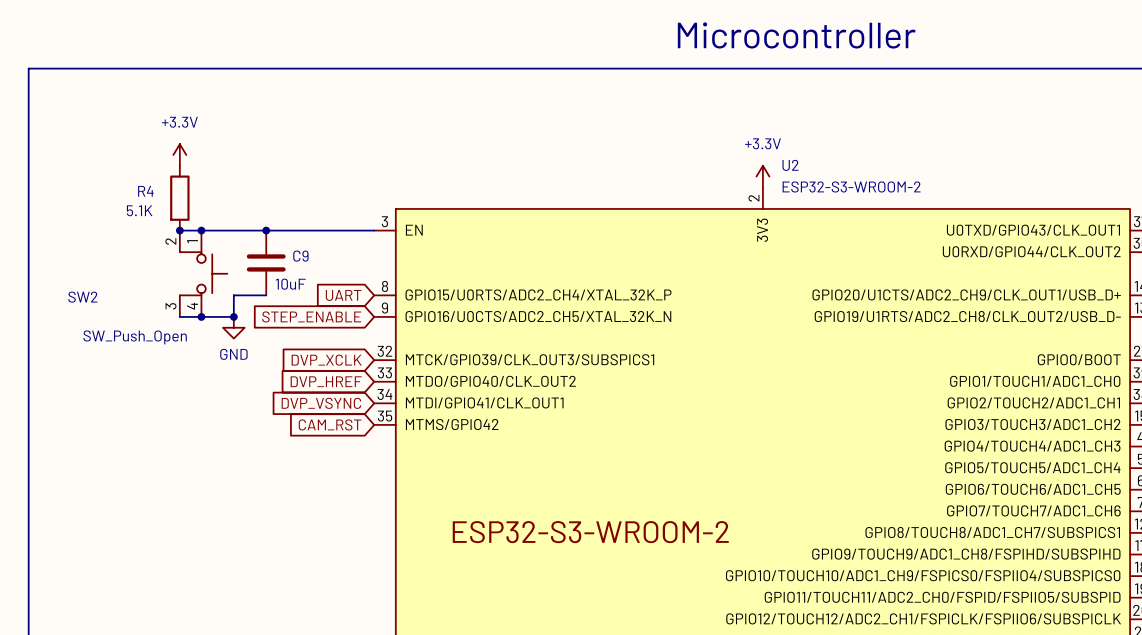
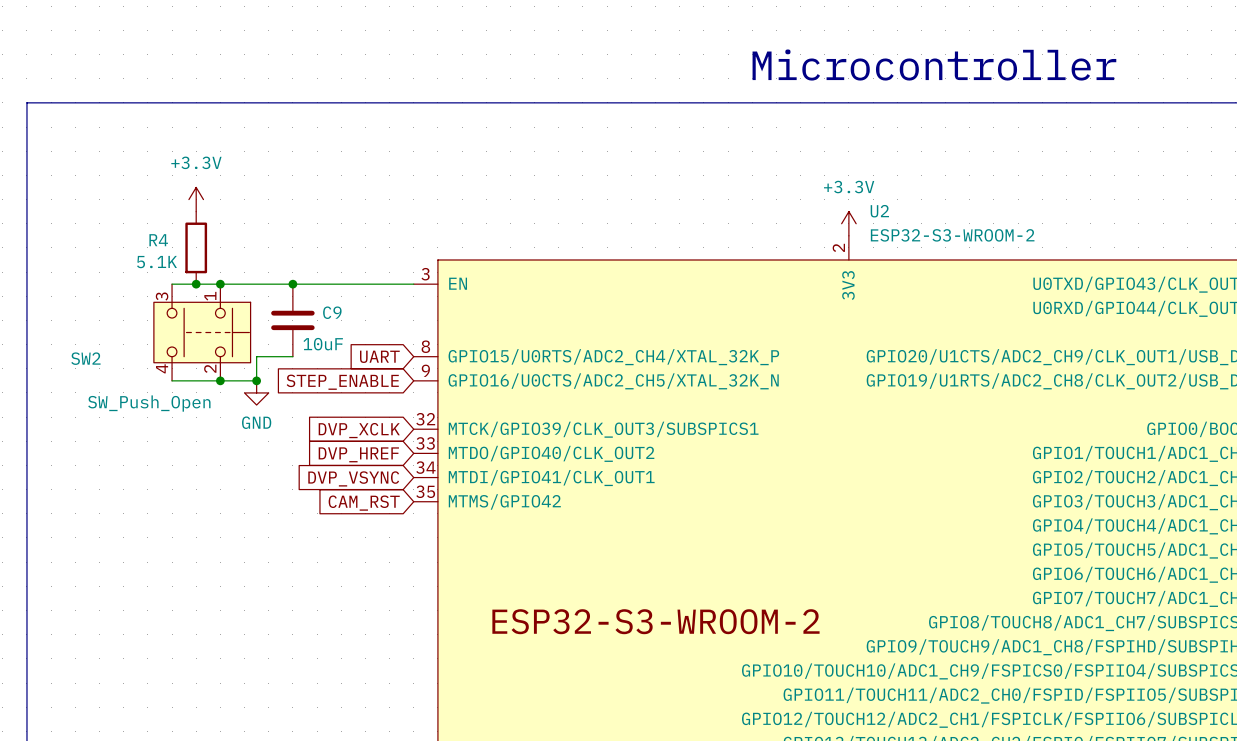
wire: none -> (172, 284) (196, 284)
SW2 symbol: [179, 230, 228, 317] -> [153, 284, 251, 381]
wire: none -> (172, 380) (196, 380)

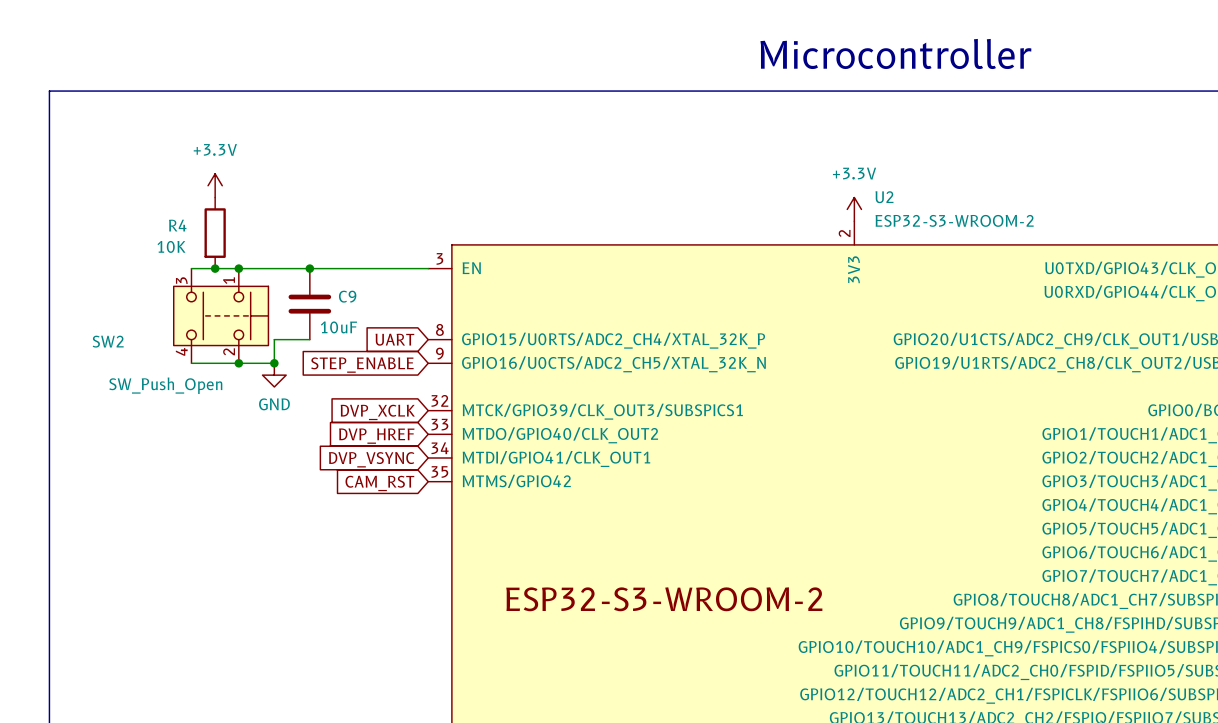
R4 value: 5.1K (156, 262) -> 10K (171, 246)

